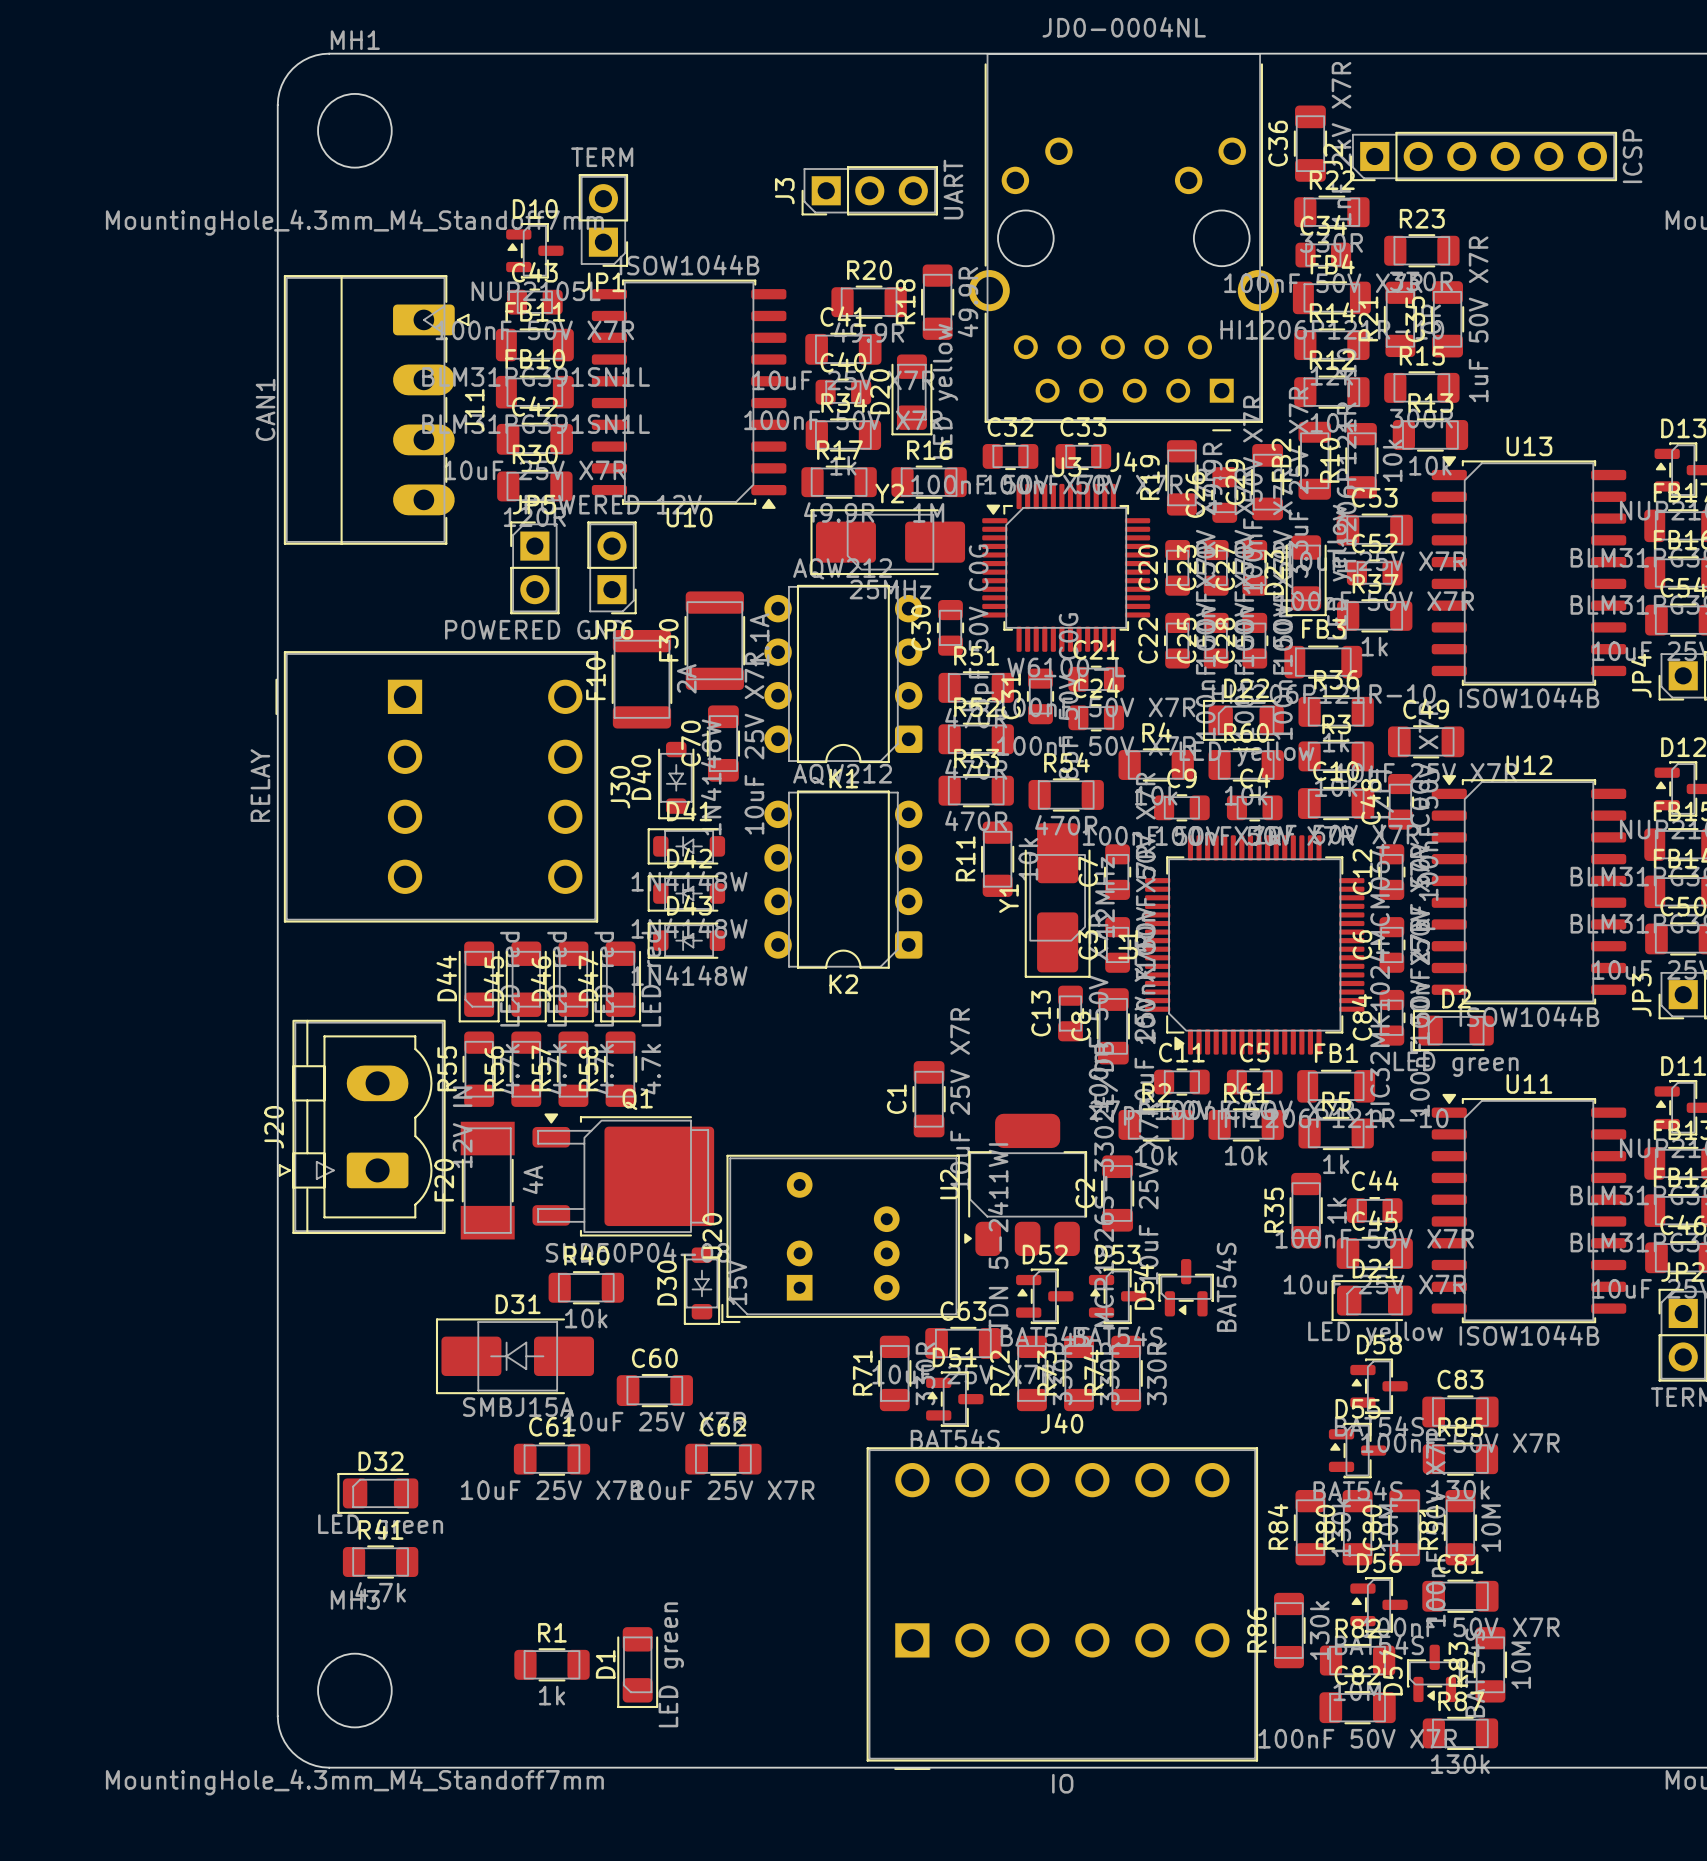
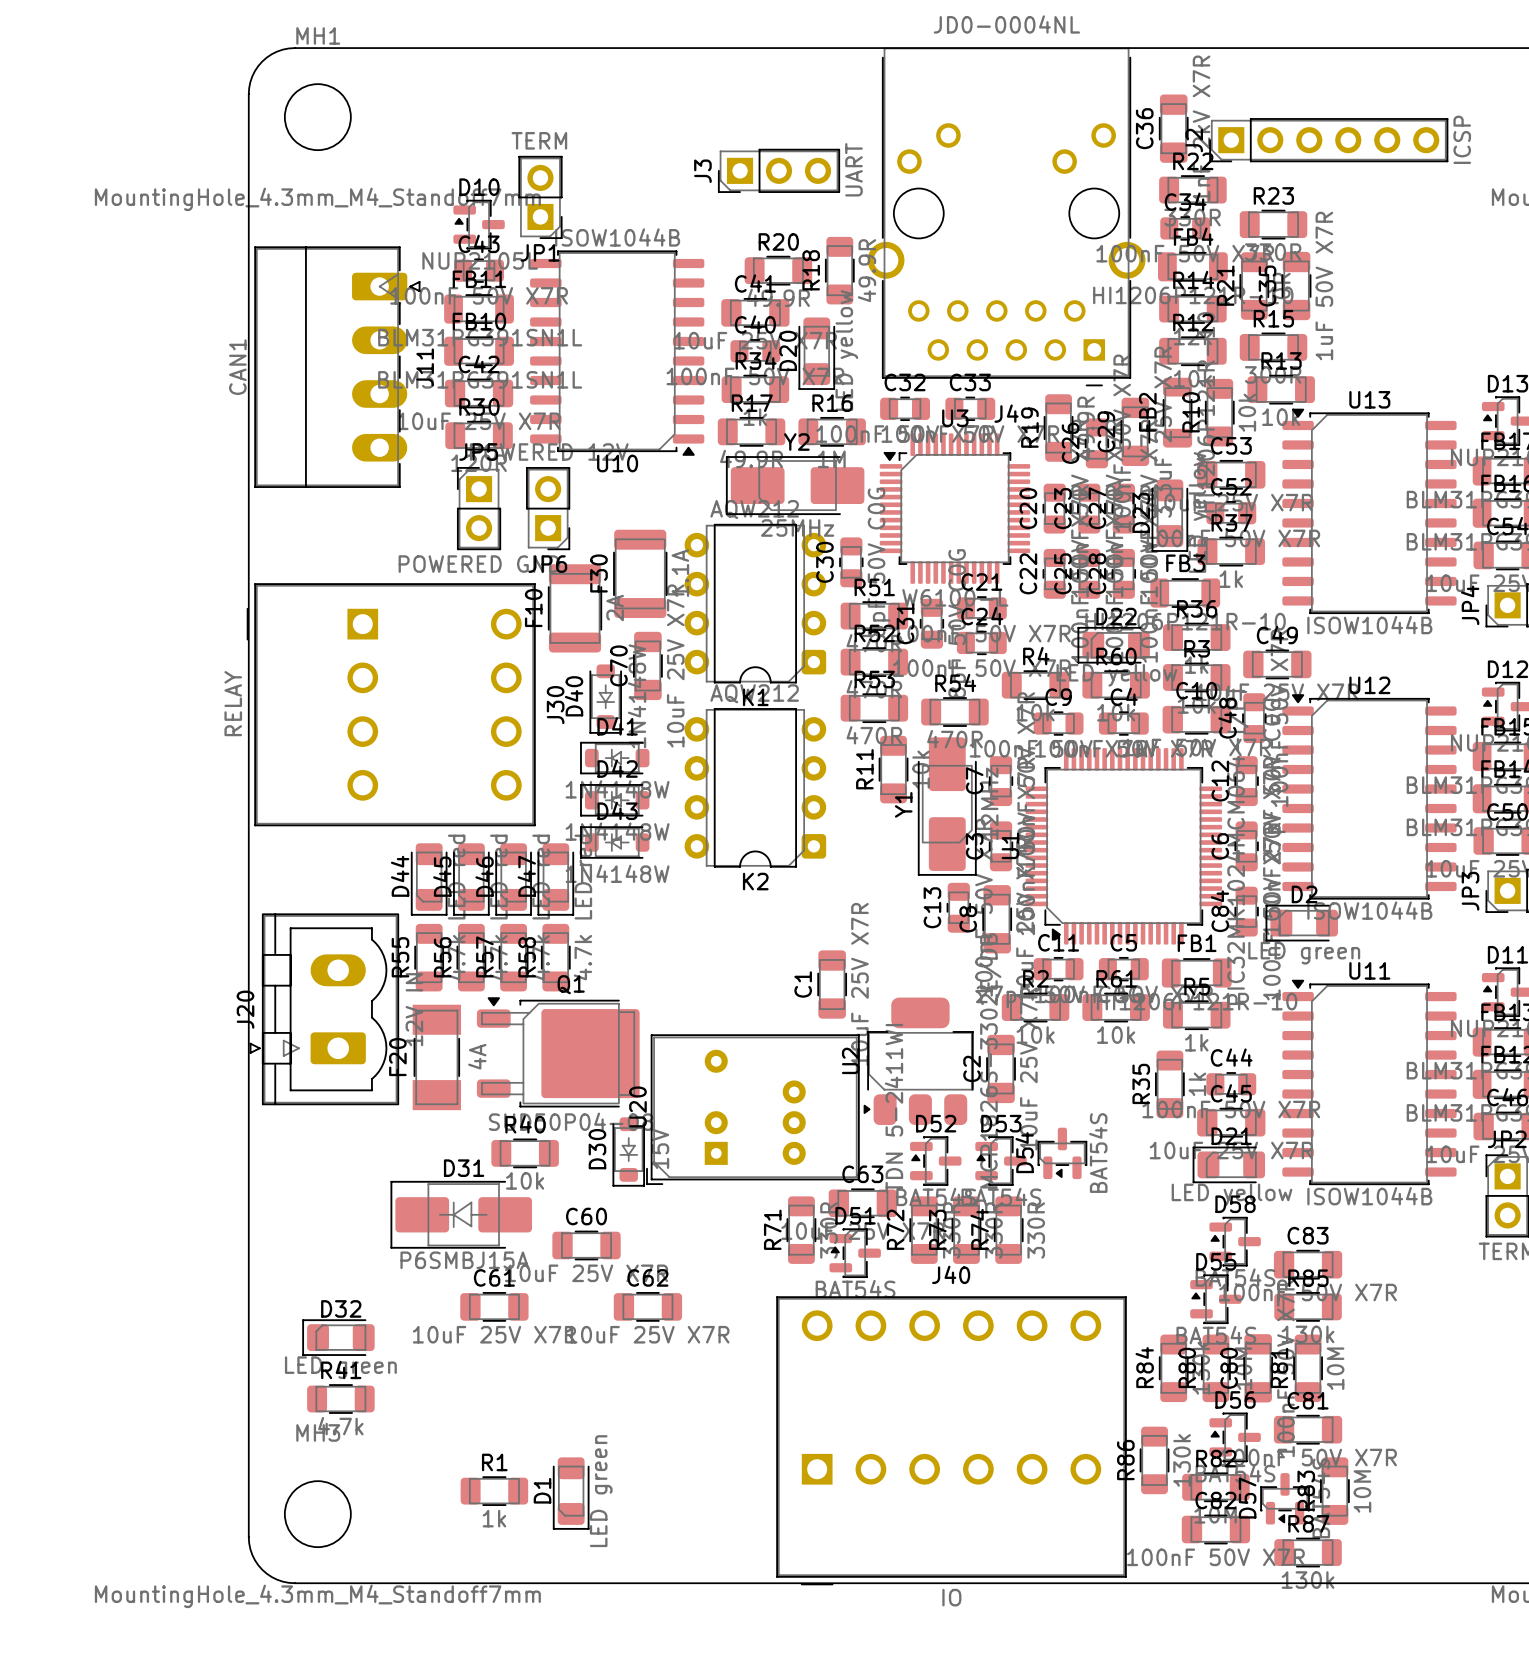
D31 value: SMBJ15A (518, 1407) -> P6SMBJ15A (464, 1260)

